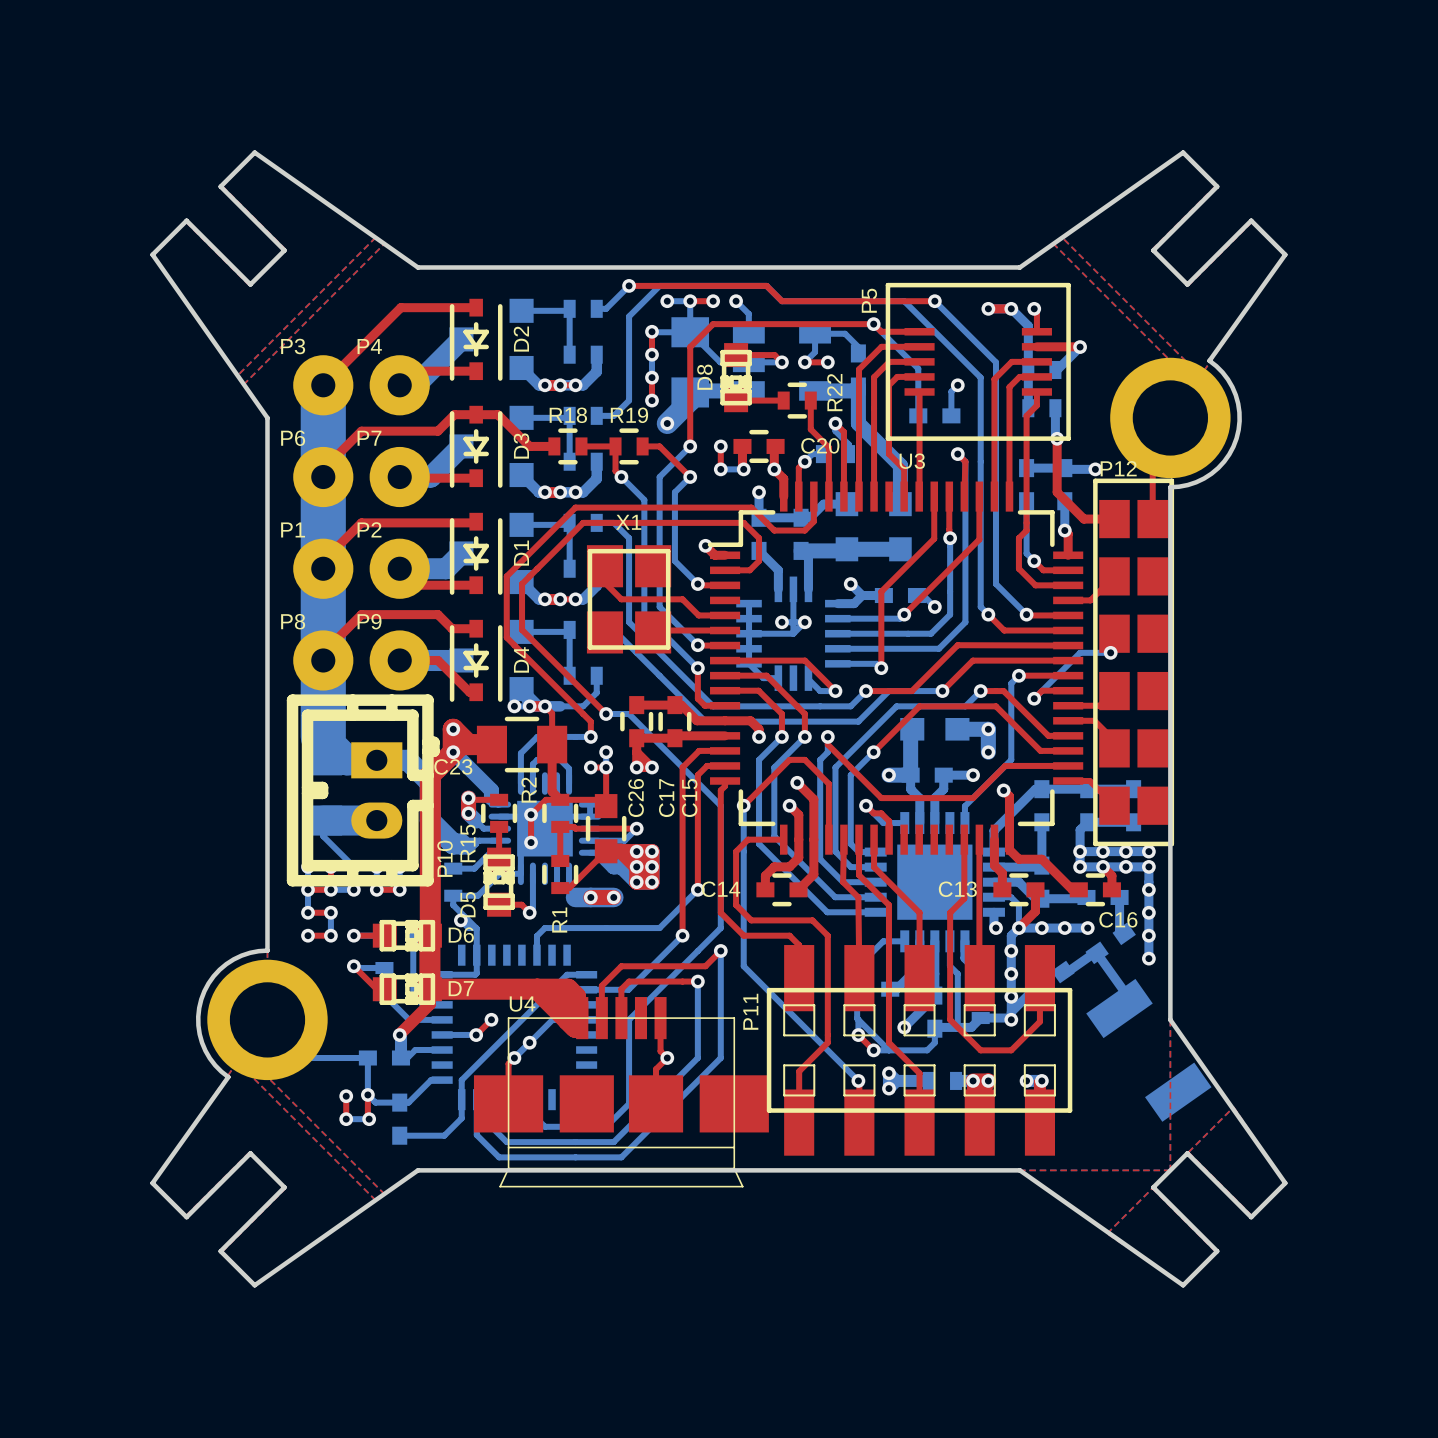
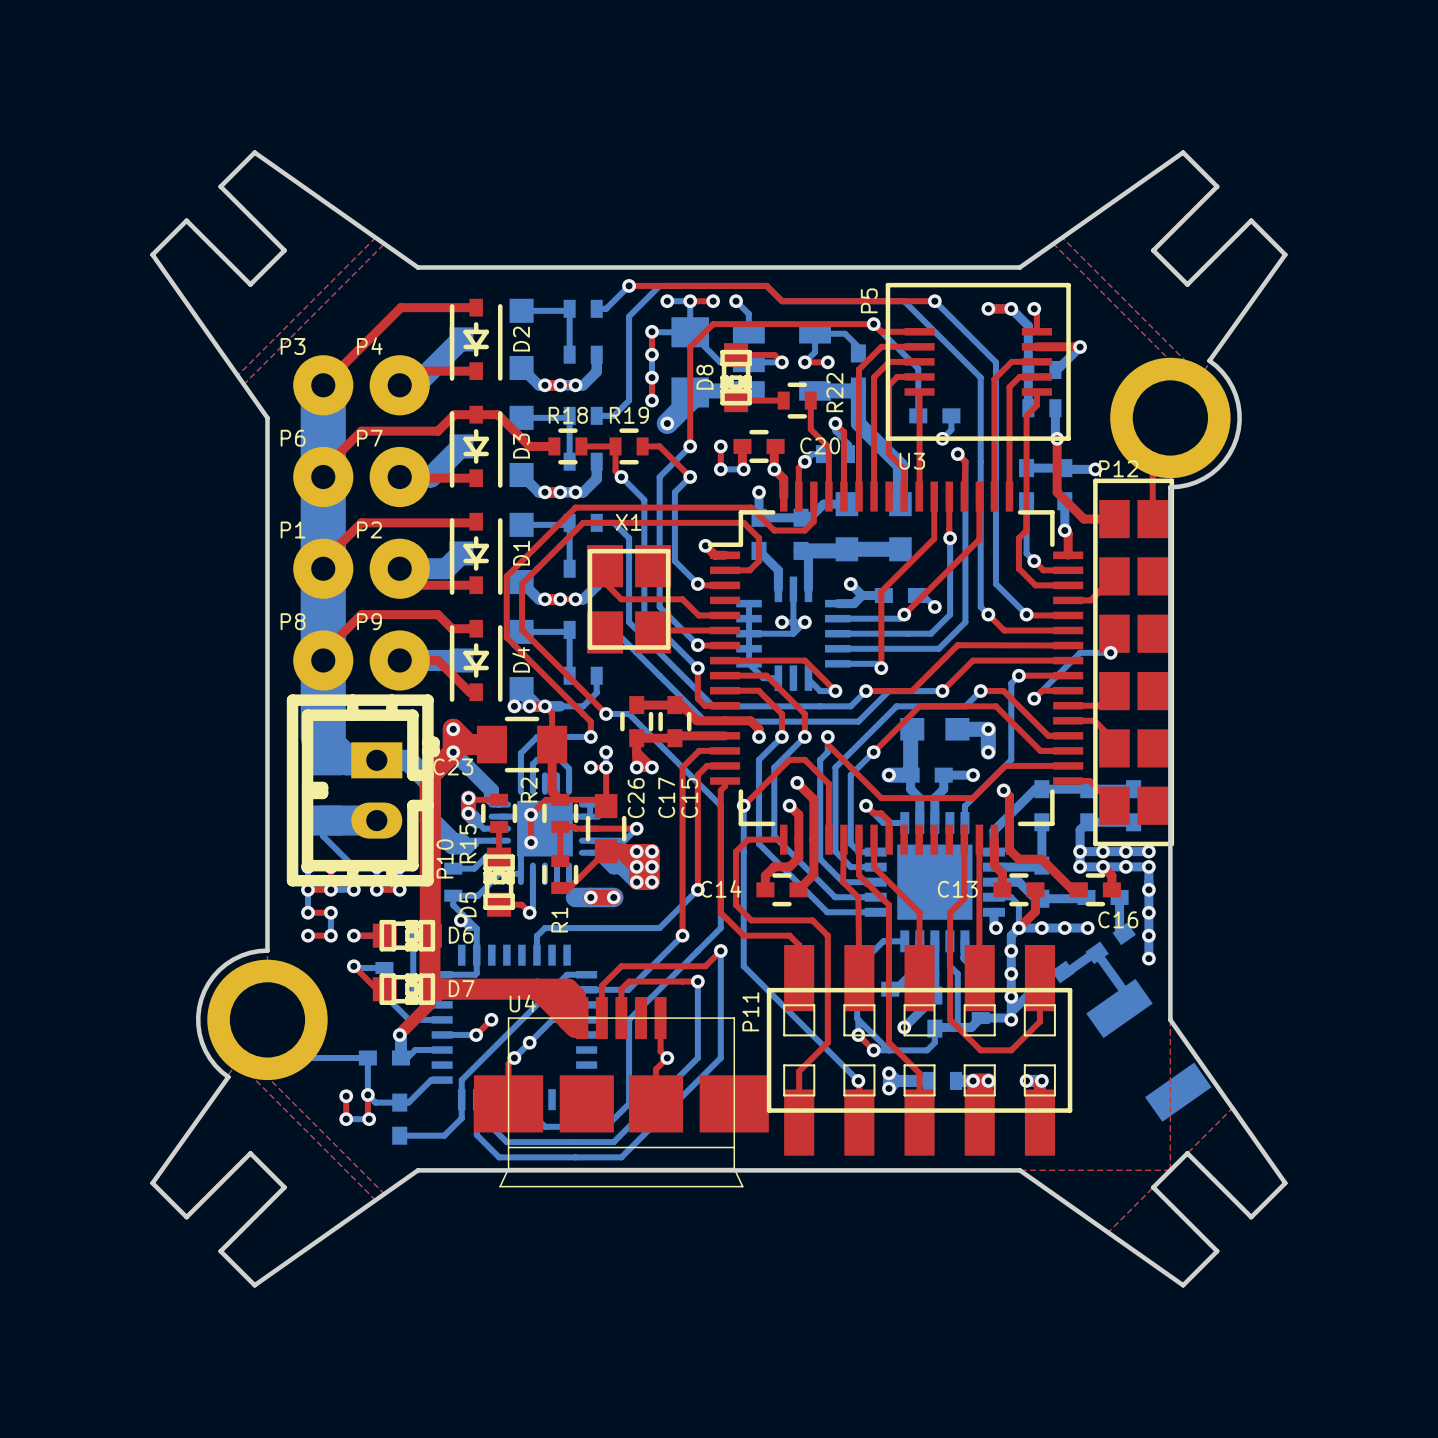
bottom track: (957, 385) (951, 391) (951, 415) -> (942, 438) (951, 429) (951, 415)
via: (957, 385) -> none
via: none -> (942, 438)

